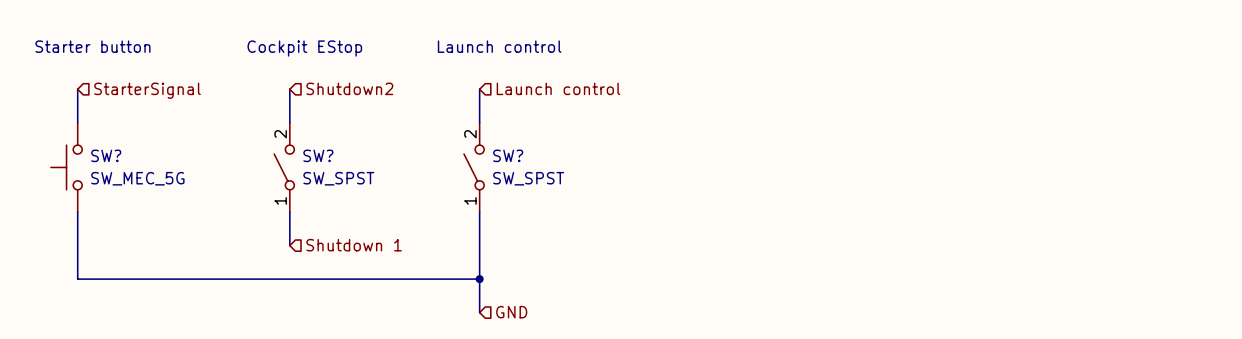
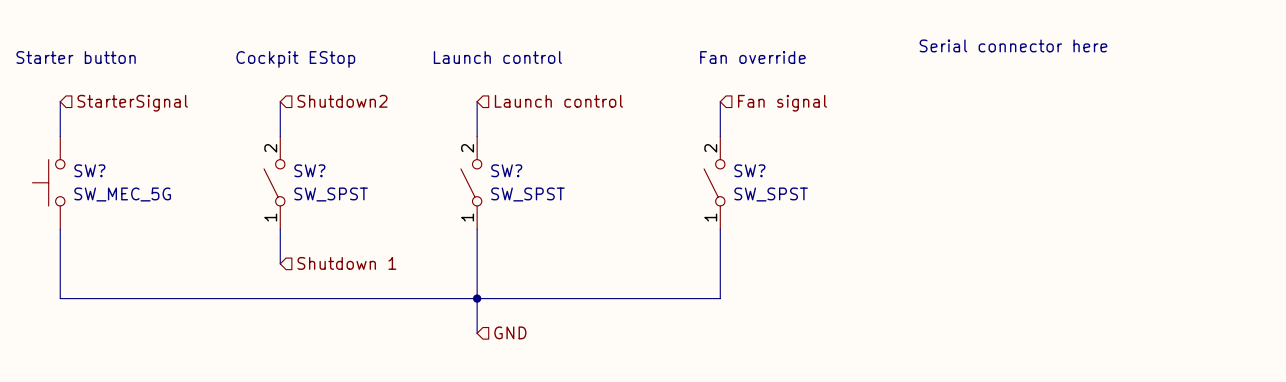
text: none -> Serial connector here (1013, 45)
text: none -> Fan override (752, 57)
wire: none -> (720, 101) (720, 136)
hierarchical label: none -> Fan signal (782, 103)
SW?: none -> SW_SPST (714, 182)
wire: none -> (720, 229) (720, 298) (477, 298)

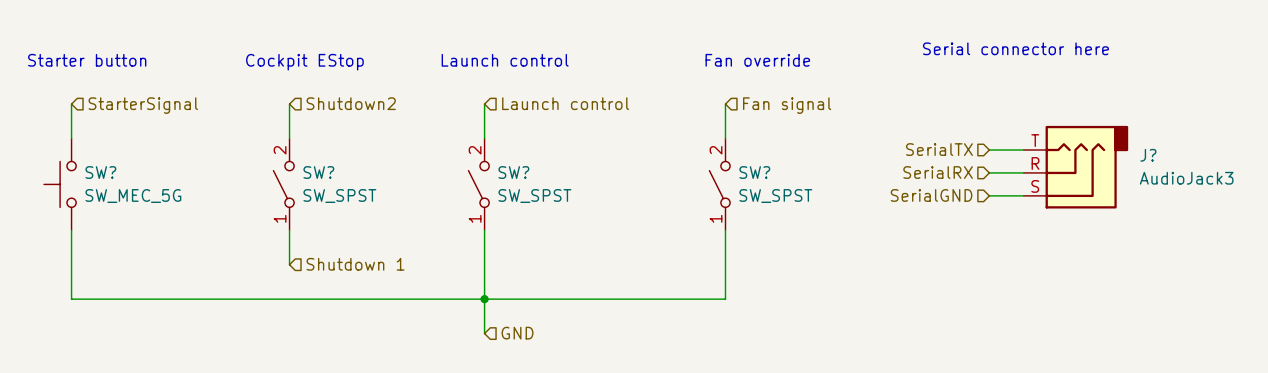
hierarchical label: none -> SerialTX (939, 149)
wire: none -> (989, 150) (1023, 150)
J?: none -> AudioJack3 (1075, 167)
hierarchical label: none -> SerialRX (938, 172)
wire: none -> (989, 172) (1023, 172)
hierarchical label: none -> SerialGND (931, 195)
wire: none -> (989, 195) (1023, 195)

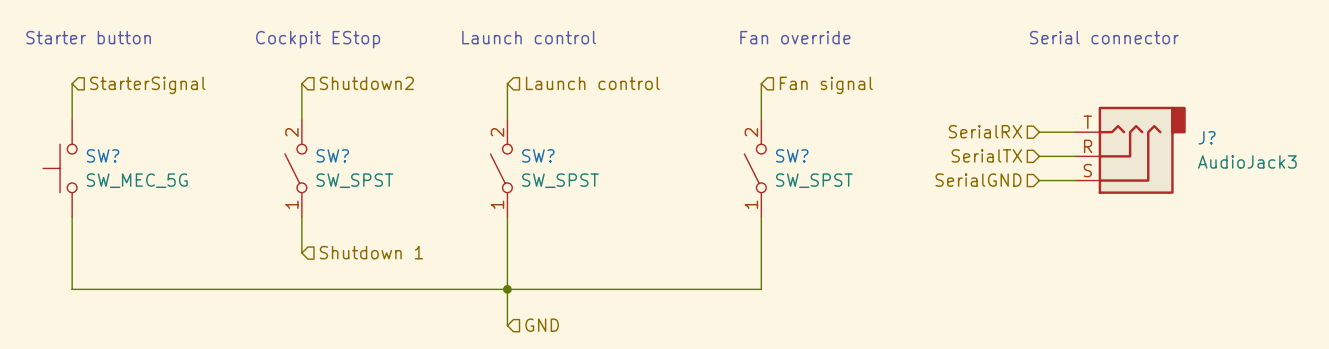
text: Serial connector here (1015, 48) -> Serial connector (1104, 37)
hierarchical label: SerialTX (939, 149) -> SerialRX (985, 131)
hierarchical label: SerialRX (938, 172) -> SerialTX (986, 155)

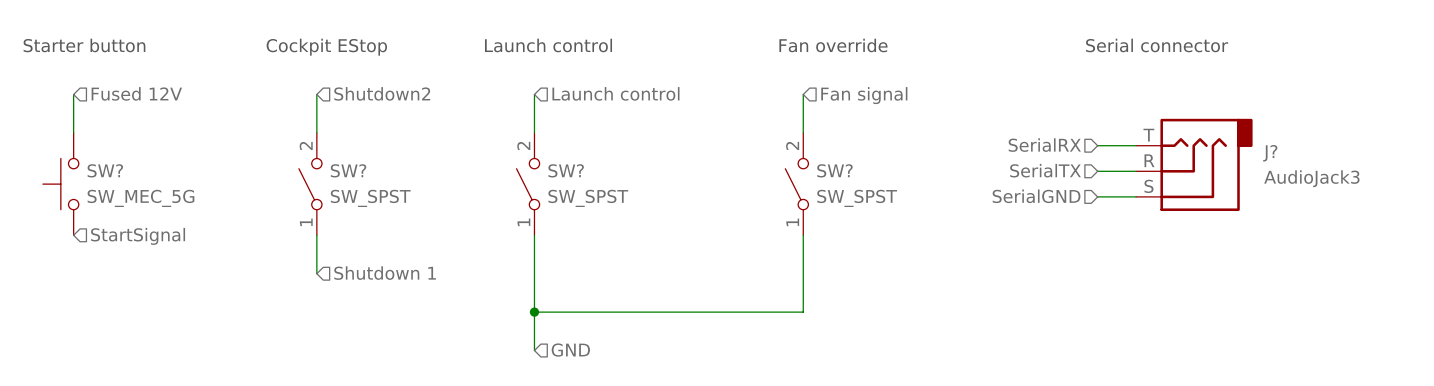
hierarchical label: StarterSignal (147, 85) -> Fused 12V (136, 93)
wire: (72, 216) (72, 289) (507, 289) -> none
hierarchical label: none -> StartSignal (138, 236)

